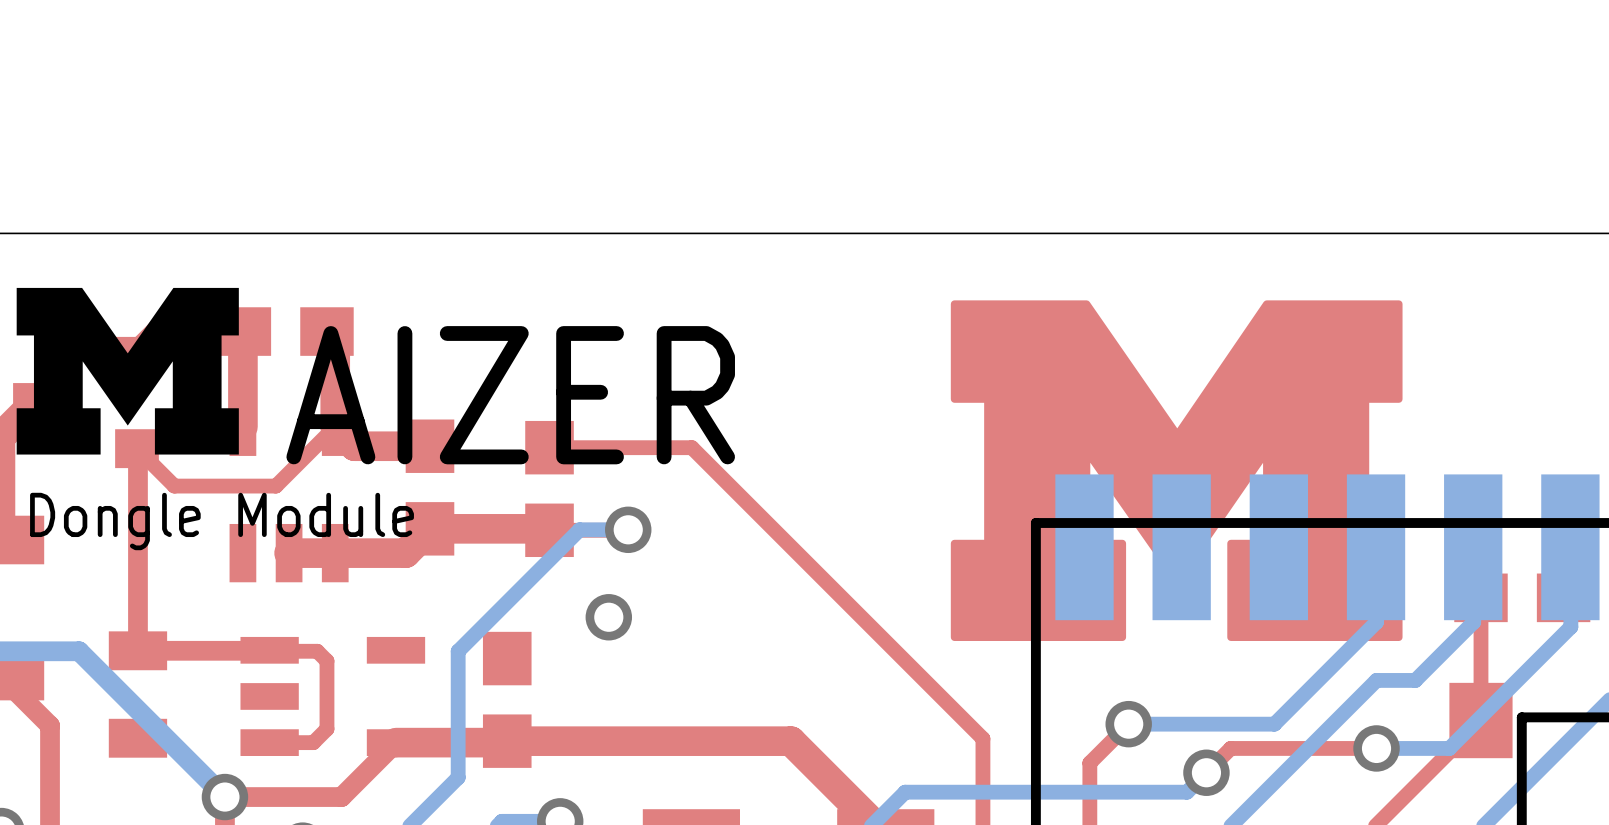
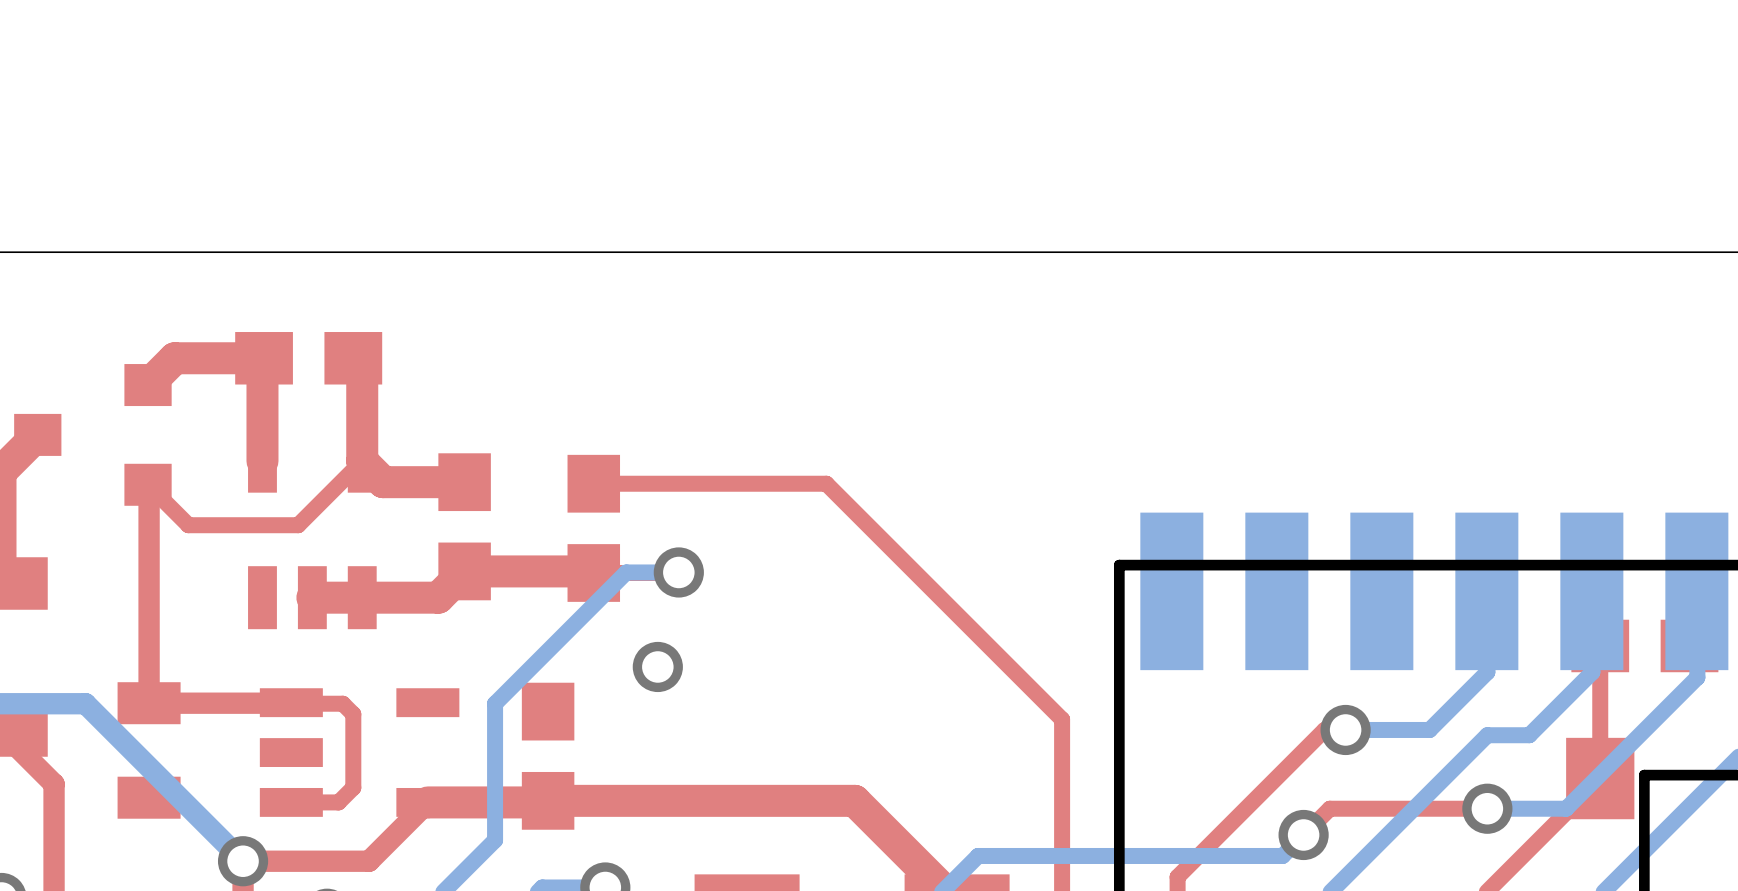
drawing: [16, 287, 239, 455] -> none
drawing: [950, 300, 1403, 641] -> none
text: AIZER (510, 395) -> none
top track: (691, 447) (982, 738) -> (747, 483) (826, 483) (1062, 719) (1062, 798)
text: Dongle Module (222, 521) -> none
bottom track: (1323, 675) (1274, 724) (1128, 724) -> (1429, 729) (1345, 729)
top track: (1128, 724) (1089, 763) (1089, 811) -> (1345, 729) (1324, 729) (1177, 876)
via position: (1128, 724) -> (1345, 729)

